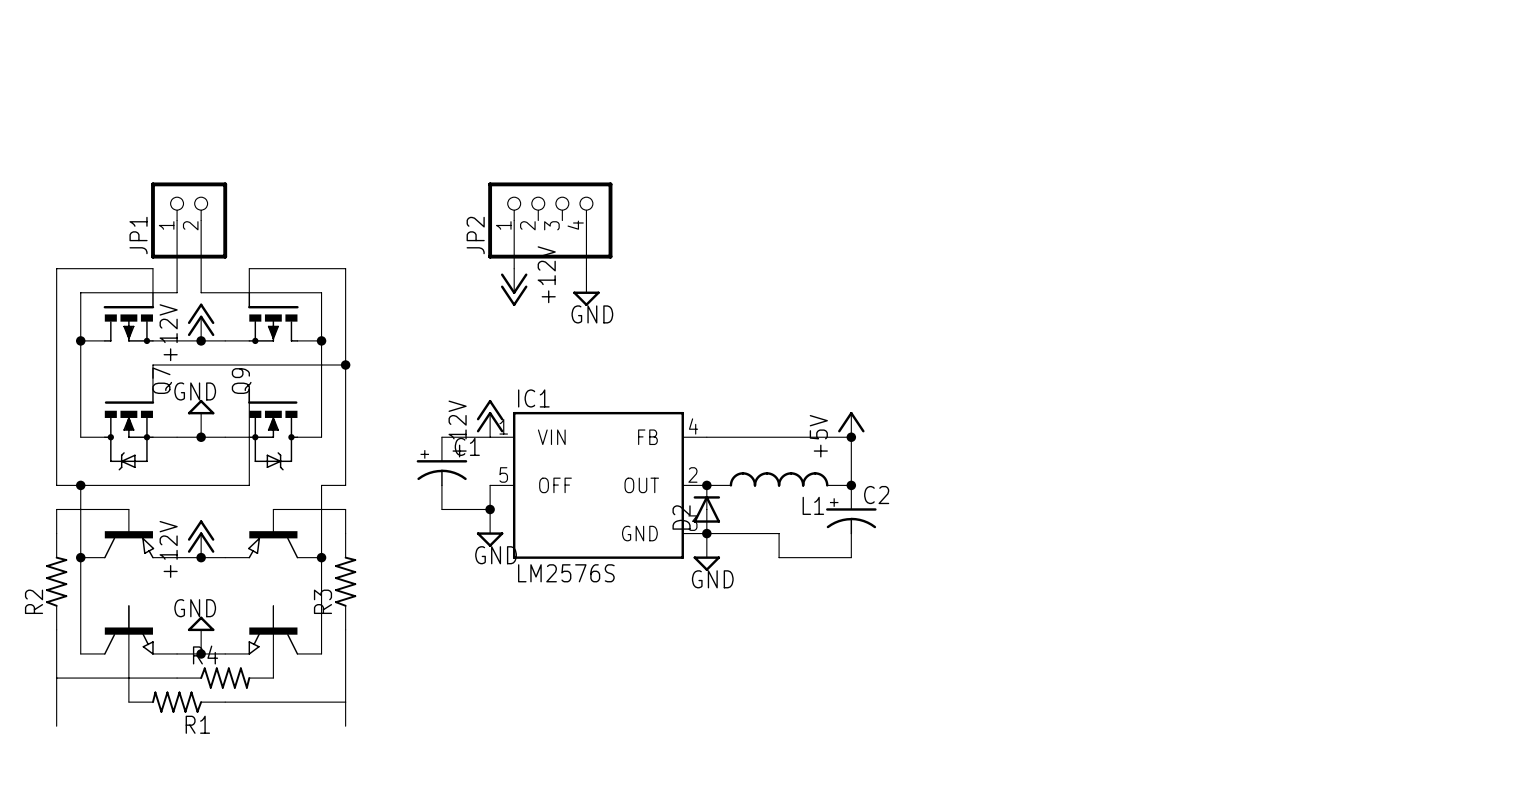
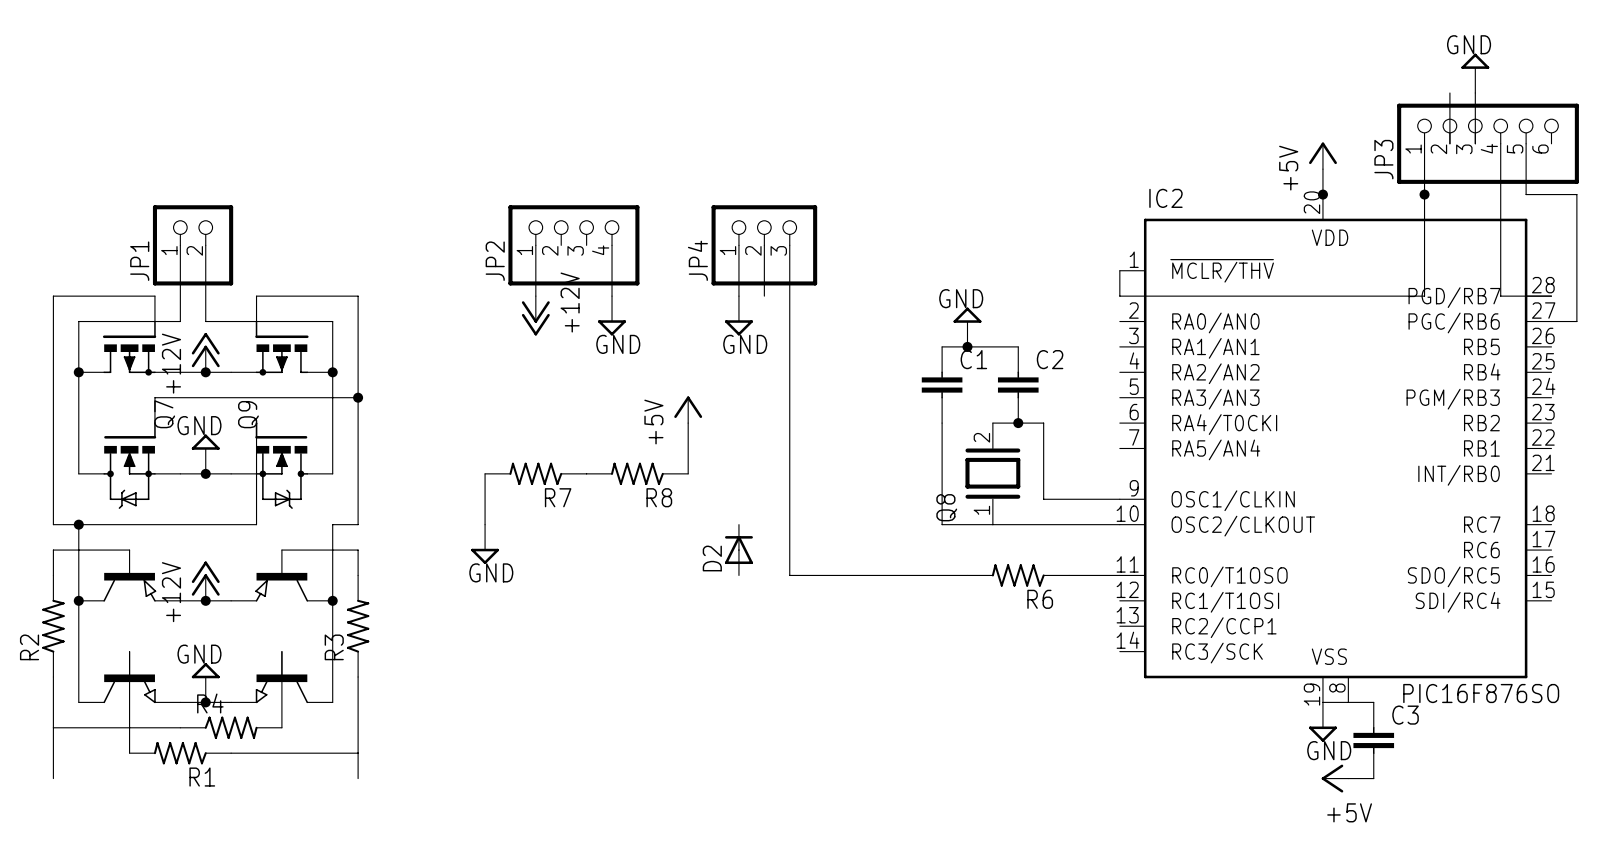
power symbol: none -> GND (1475, 73)
wire: none -> (1449, 93) (1449, 143)
wire: none -> (1475, 93) (1475, 143)
wire: none -> (1424, 143) (1424, 296) (1119, 296) (1119, 270)
JP3: none -> (1488, 143)
wire: none -> (1500, 143) (1500, 296) (1551, 296)
wire: none -> (1526, 143) (1526, 194) (1576, 194) (1576, 321) (1551, 321)
power symbol: none -> +5V (1322, 155)
wire: none -> (1322, 169) (1322, 194)
junction: none -> (1322, 194)
junction: none -> (1424, 194)
wire: none -> (738, 245) (738, 296)
wire: none -> (764, 245) (764, 296)
JP4: none -> (764, 245)
power symbol: none -> GND (738, 315)
power symbol: none -> GND (967, 327)
wire: none -> (942, 346) (1018, 346)
junction: none -> (967, 346)
wire: none -> (688, 423) (688, 473)
wire: none -> (942, 423) (942, 524) (1119, 524)
wire: none -> (992, 423) (1043, 423) (1043, 499) (1119, 499)
junction: none -> (1018, 423)
IC2: none -> PIC16F876SO (1335, 448)
power symbol: +12V (490, 418) -> none
power symbol position: +5V (851, 424) -> +5V (688, 409)
C1 symbol: [416, 437, 468, 510] -> [921, 346, 963, 424]
wire: none -> (485, 473) (485, 524)
R7: none -> (535, 473)
R8: none -> (637, 473)
wire: (706, 437) (851, 437) (851, 485) -> none
junction: (851, 437) -> none
Q8: none -> (992, 473)
L1: (779, 479) -> none
wire: (490, 485) (490, 509) (441, 509) -> none
IC1: LM2576S (598, 485) -> none
junction: (706, 485) -> none
C2 symbol: [826, 485, 877, 558] -> [997, 346, 1039, 424]
junction: (851, 485) -> none
junction: (490, 509) -> none
power symbol position: GND (490, 528) -> GND (485, 544)
wire: (706, 533) (755, 533) -> (789, 245) (789, 575)
junction: (706, 533) -> none
wire: (779, 533) (779, 557) (851, 557) -> (815, 575) (967, 575)
R6: none -> (1018, 575)
wire: none -> (1069, 575) (1119, 575)
power symbol: GND (706, 552) -> none
wire: none -> (1322, 702) (1373, 702)
power symbol: none -> GND (1322, 722)
C3: none -> (1373, 740)
power symbol: none -> +5V (1335, 778)
wire: none -> (1348, 778) (1373, 778)

